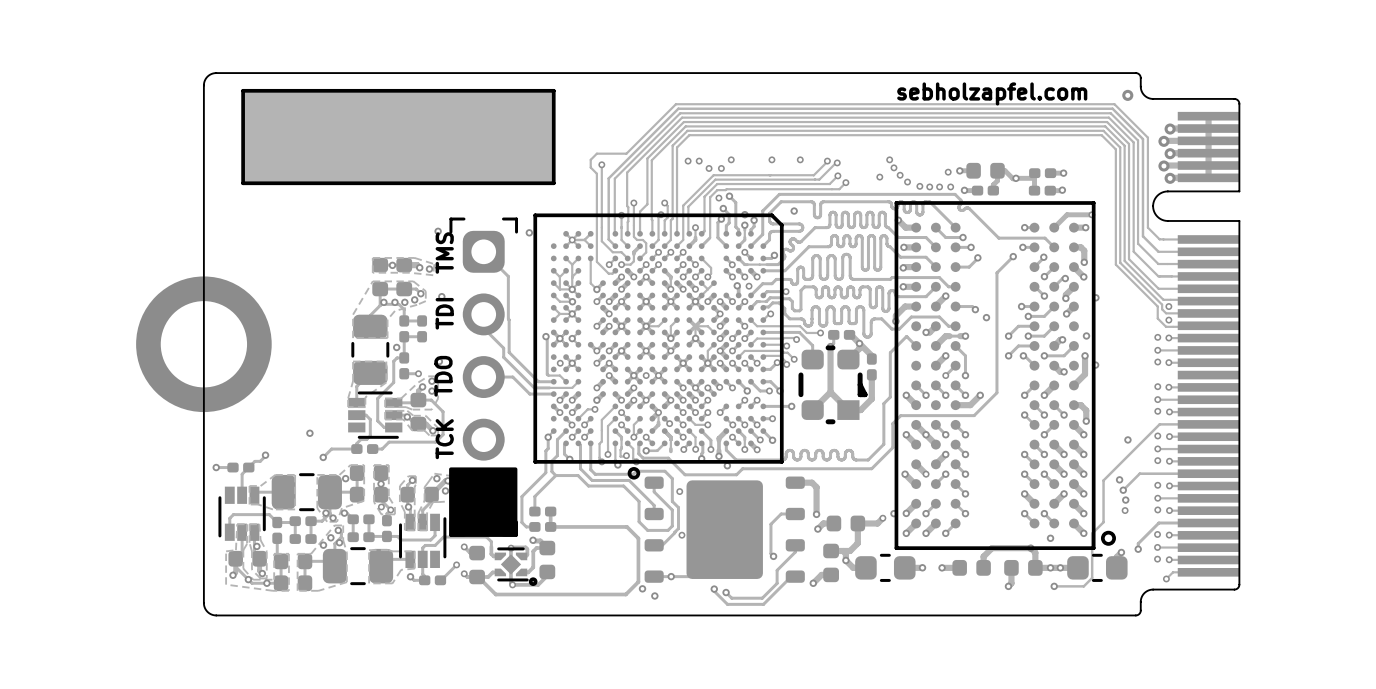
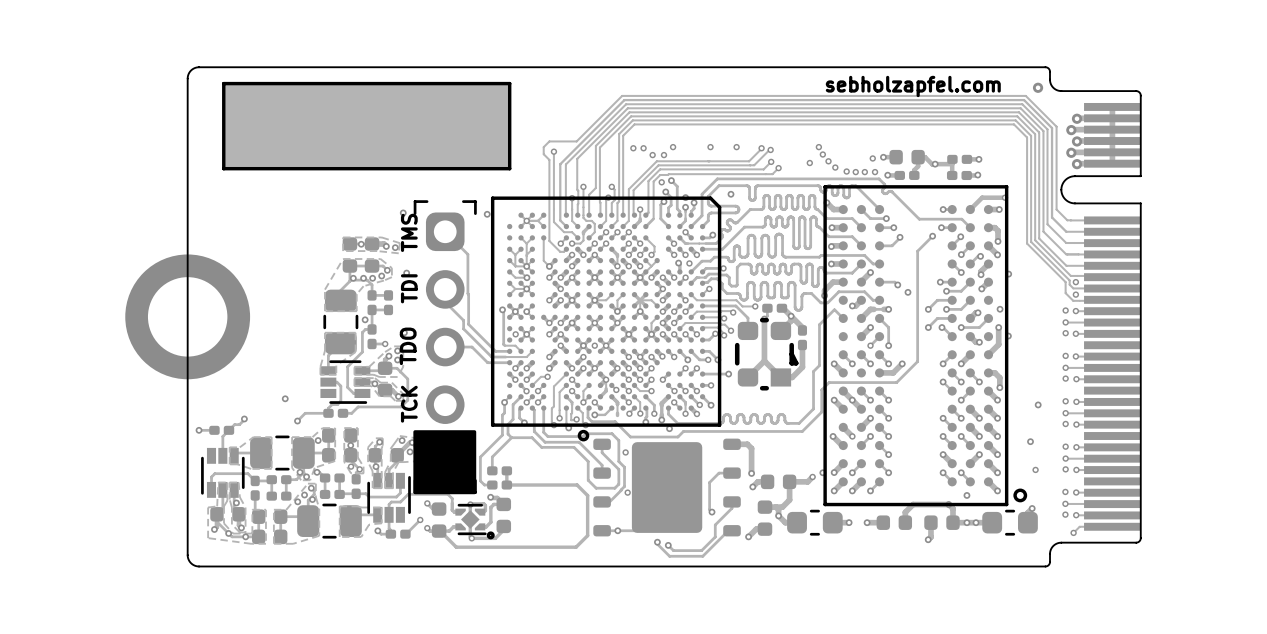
track: (1208, 424) (1159, 424) (1103, 480) (1103, 522) (1092, 533) (1092, 578) (1083, 586) (1054, 586) -> none
track: (1208, 473) (1139, 473) (1123, 490) -> none
via: (1123, 490) -> none
via: (1125, 500) -> none
track: (1208, 523) (1158, 523) (1138, 543) (1138, 549) -> none
via: (1138, 549) -> none
via: (1054, 586) -> none
via: (642, 588) -> none
via: (654, 596) -> none

